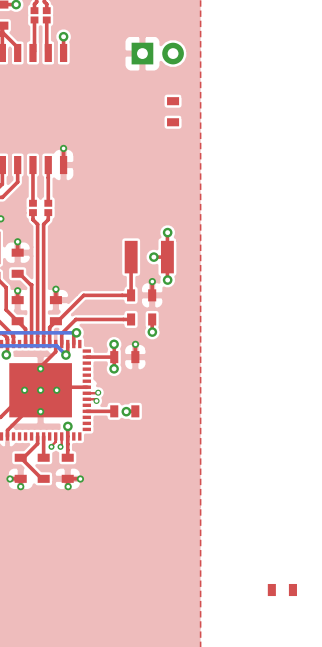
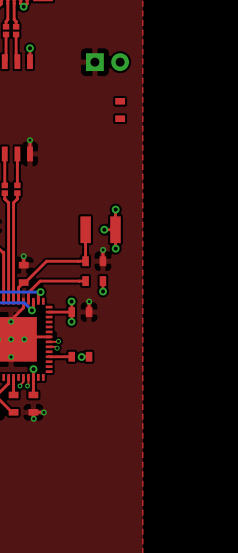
part: (282, 590) -> none

